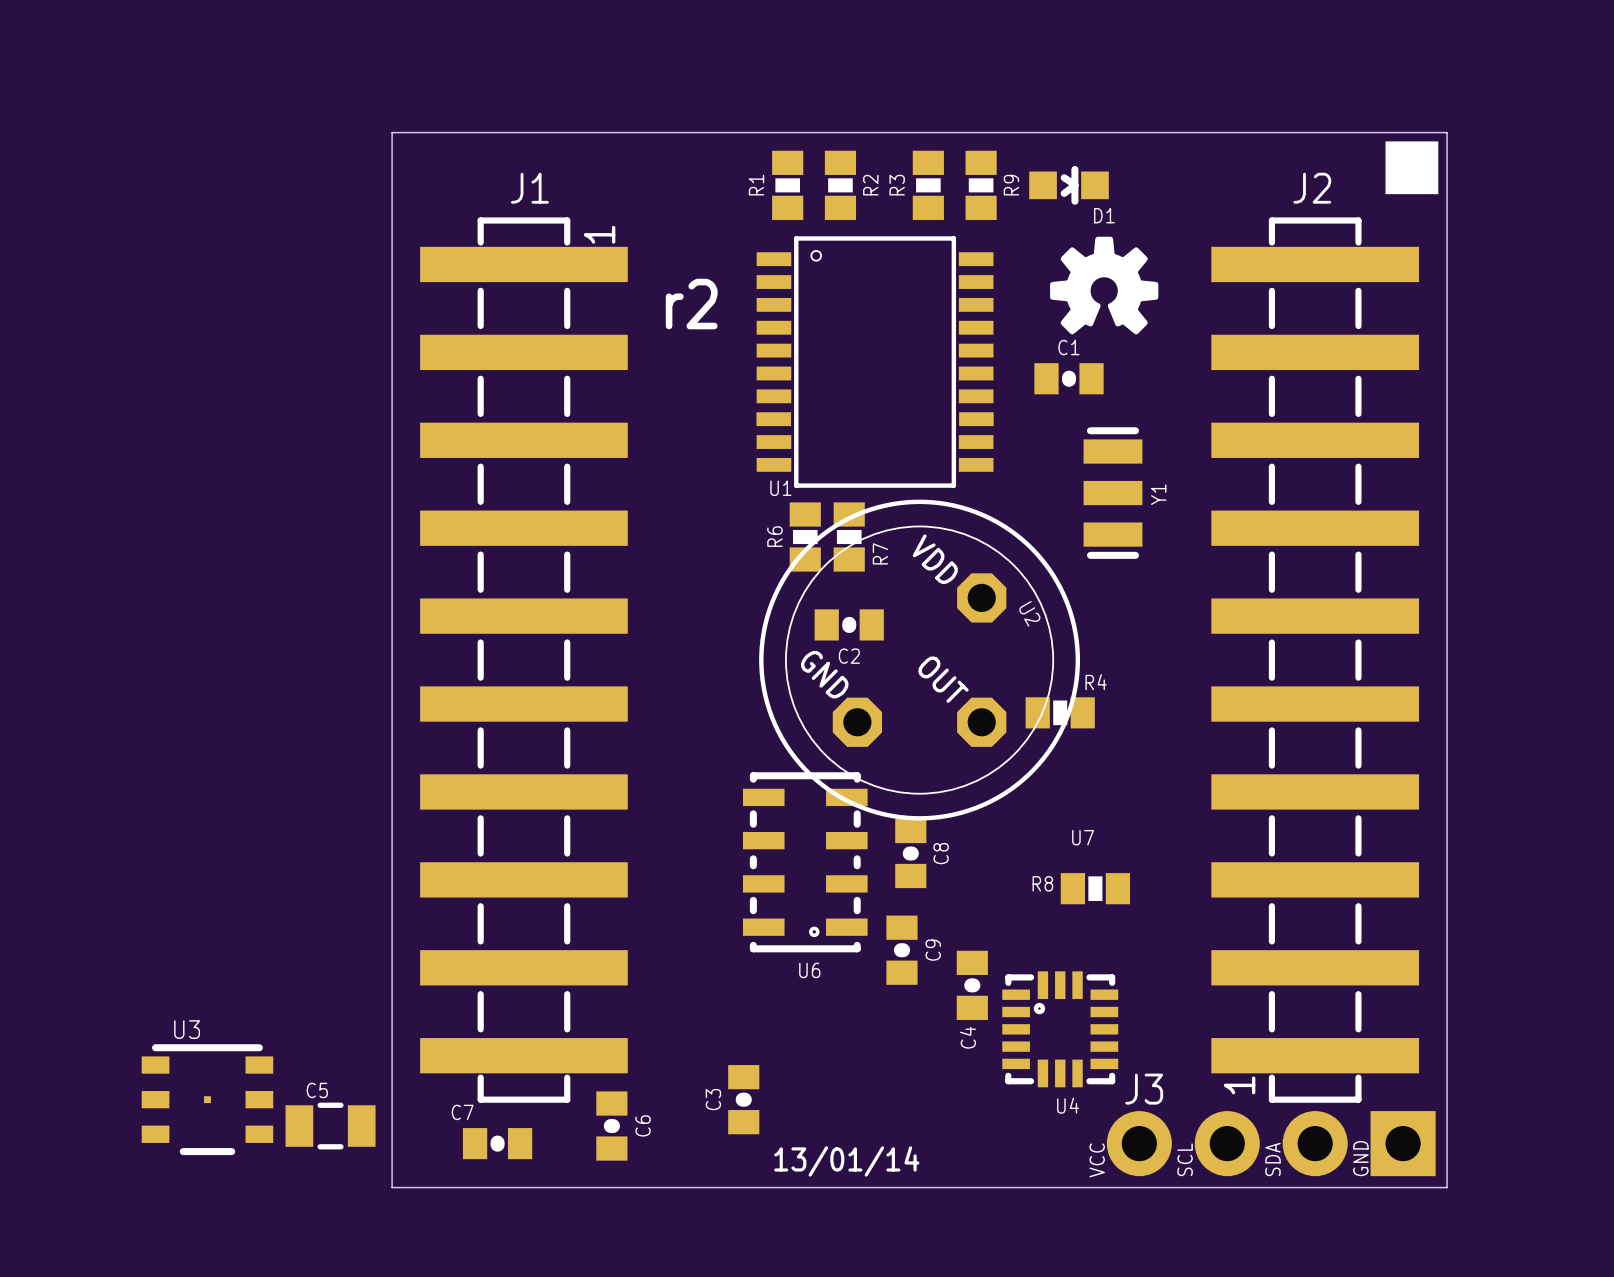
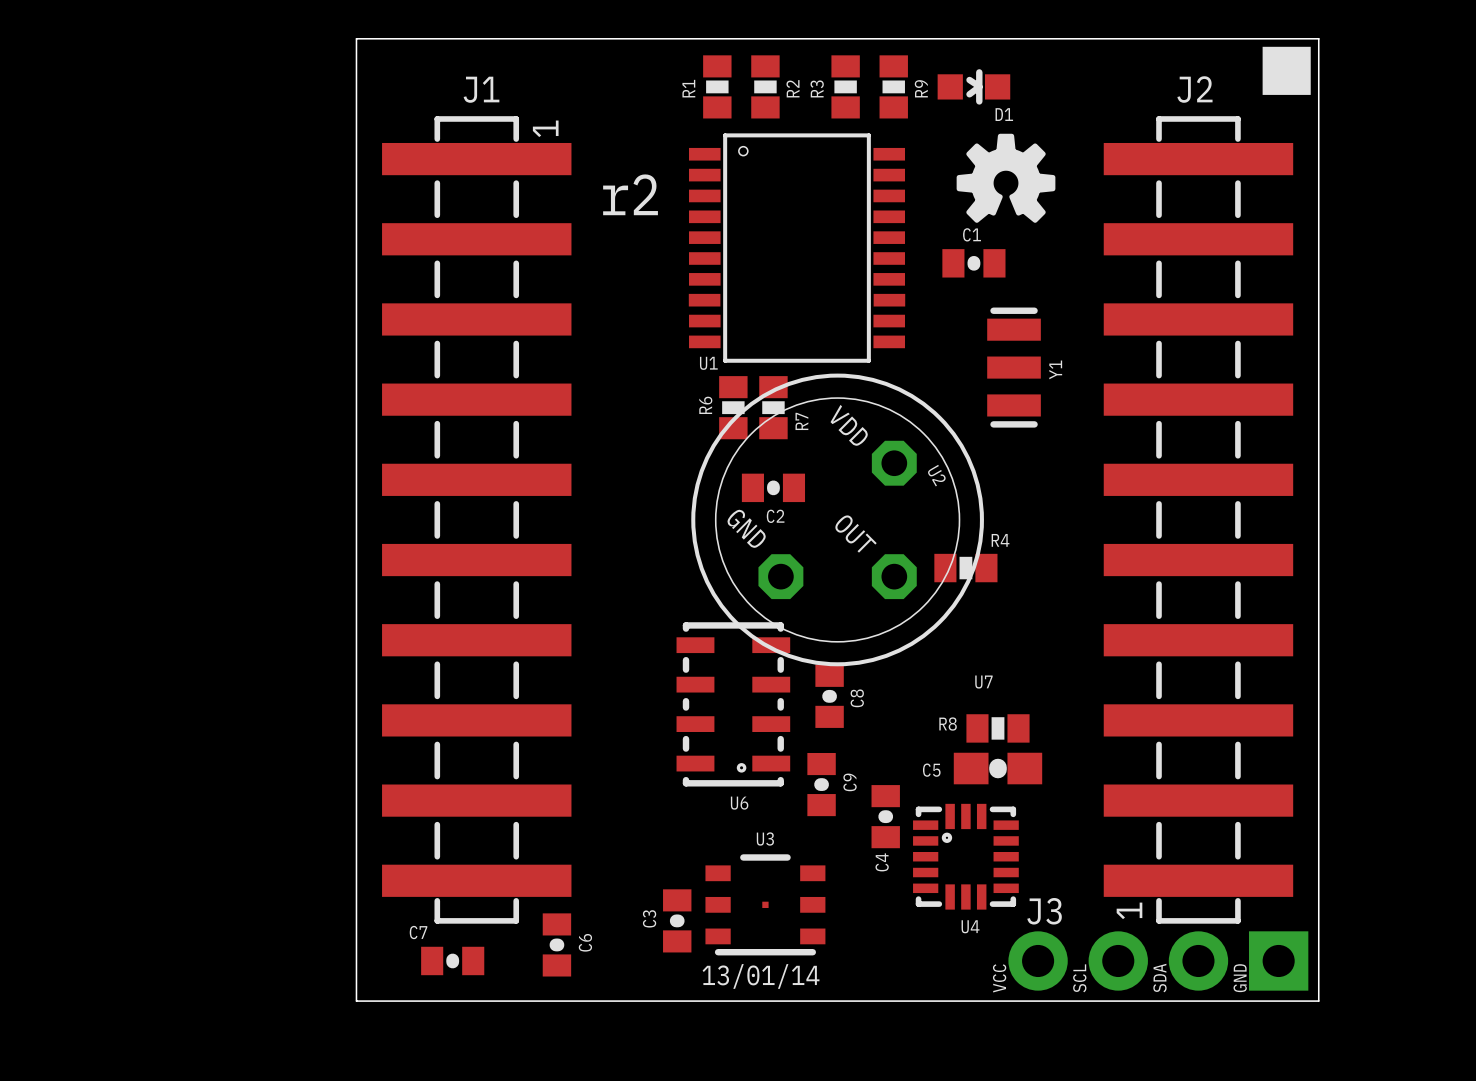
U3 rotation: 0° (207, 1099) -> 180° (765, 904)
U3 position: (207, 1099) -> (765, 904)
C5 footprint: [285, 1102, 376, 1150] -> [953, 752, 1043, 785]

